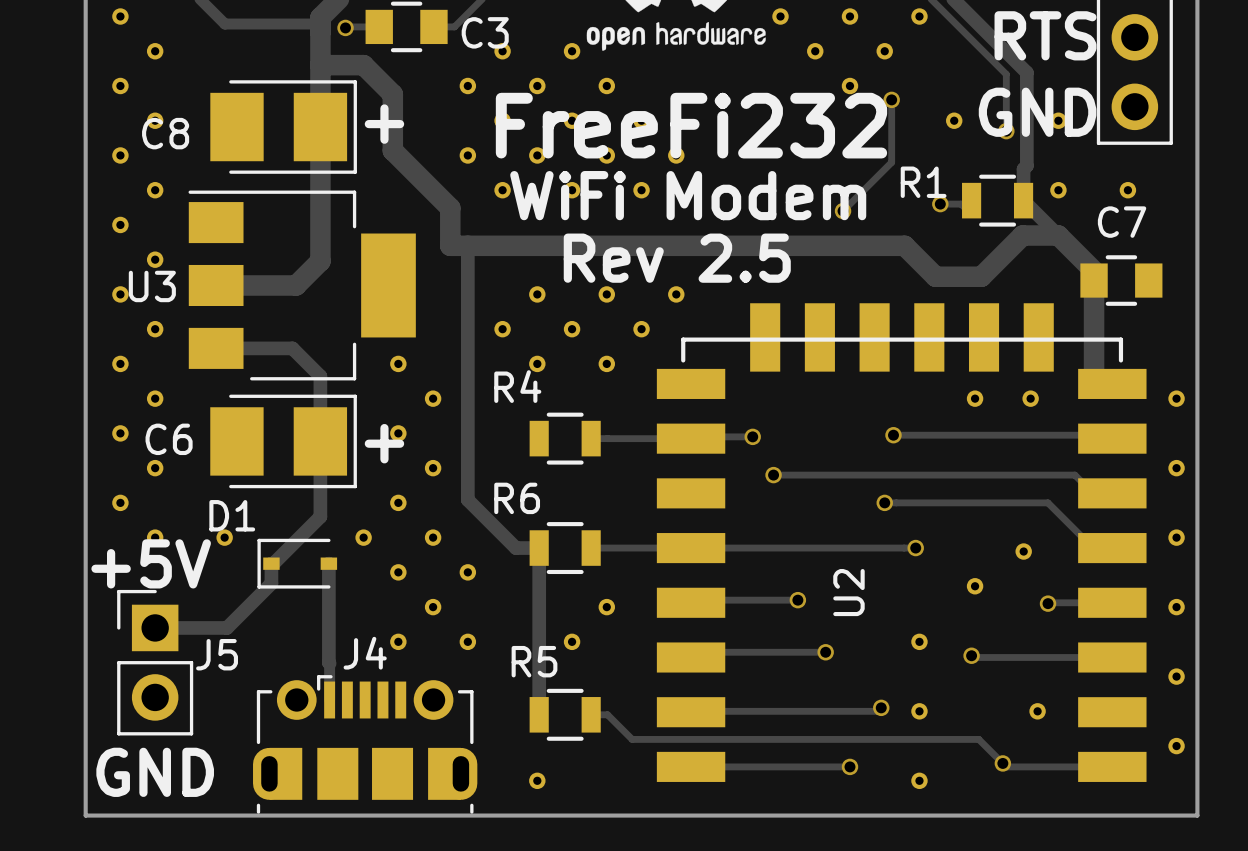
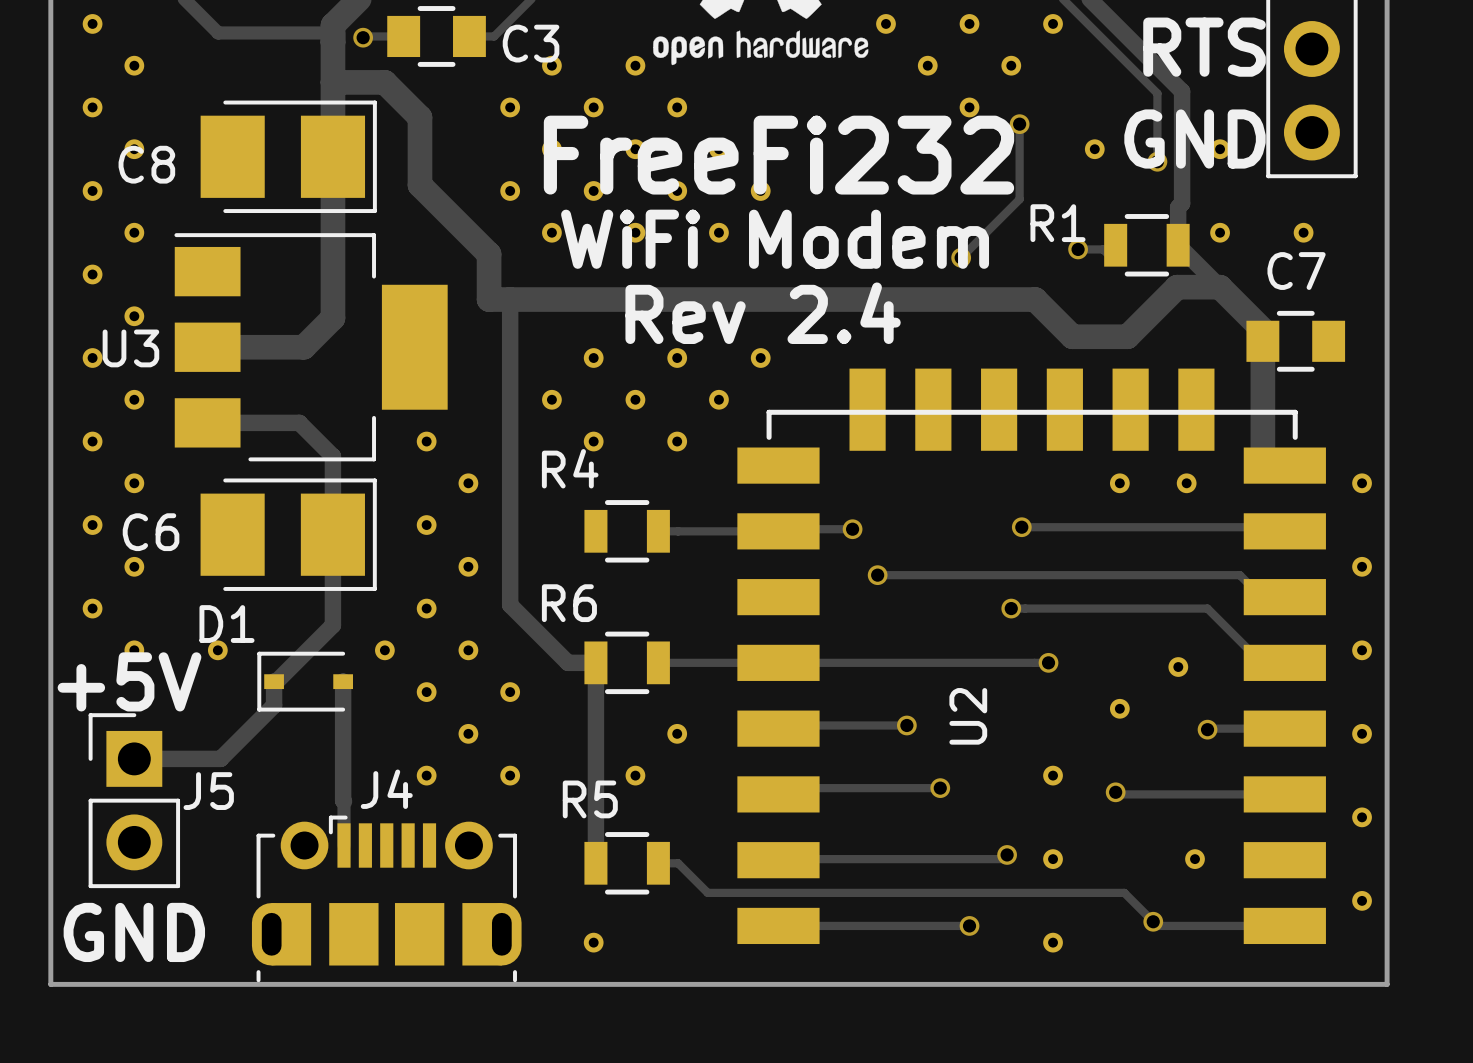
text: + (384, 124) -> none
text: Rev 2.5 (677, 258) -> Rev 2.4 (763, 313)
text: + (384, 443) -> none

